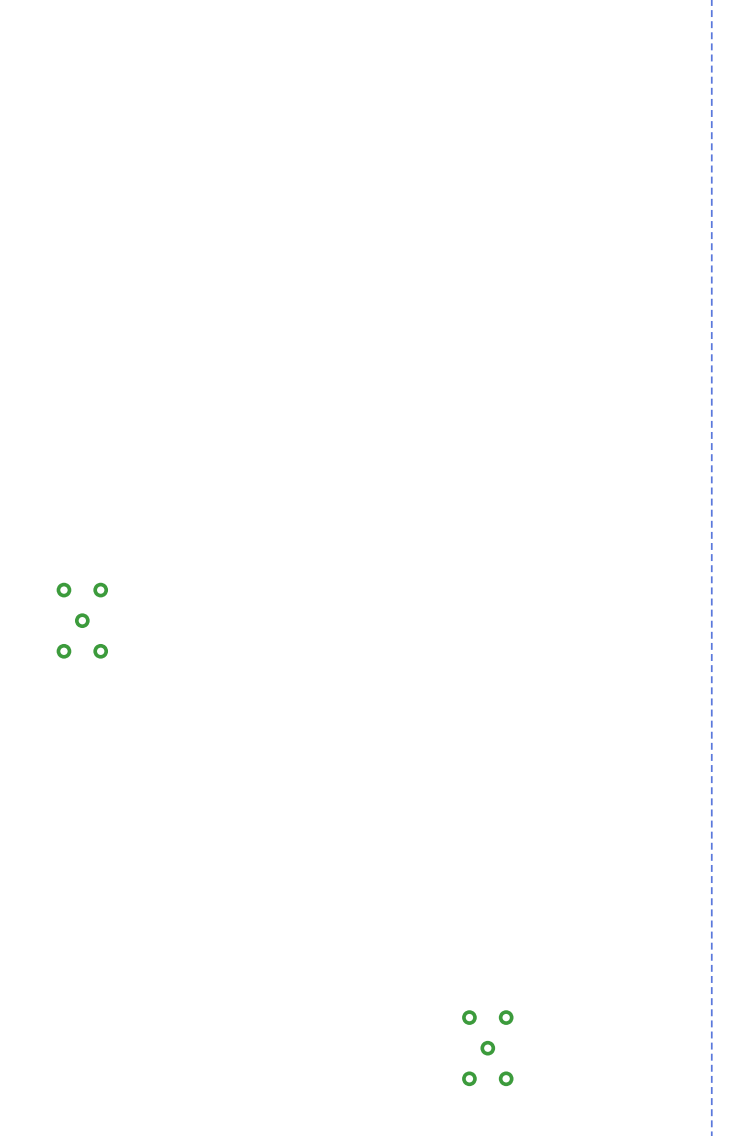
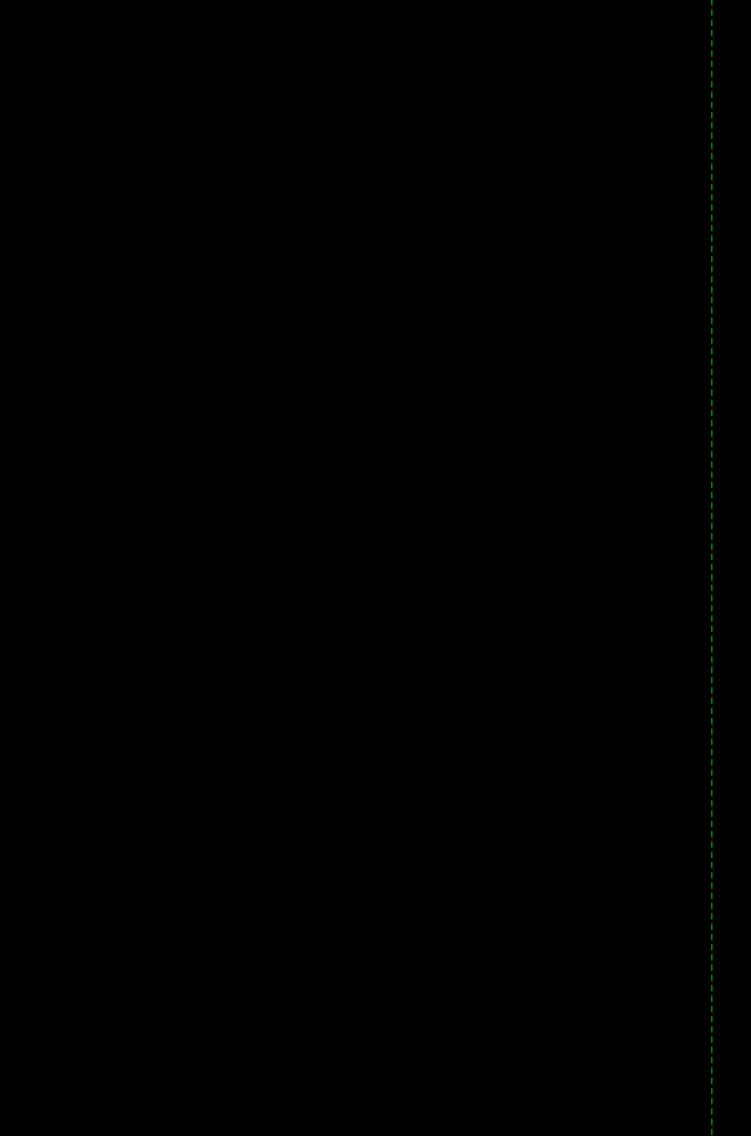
part: (82, 620) -> none
part: (487, 1048) -> none

